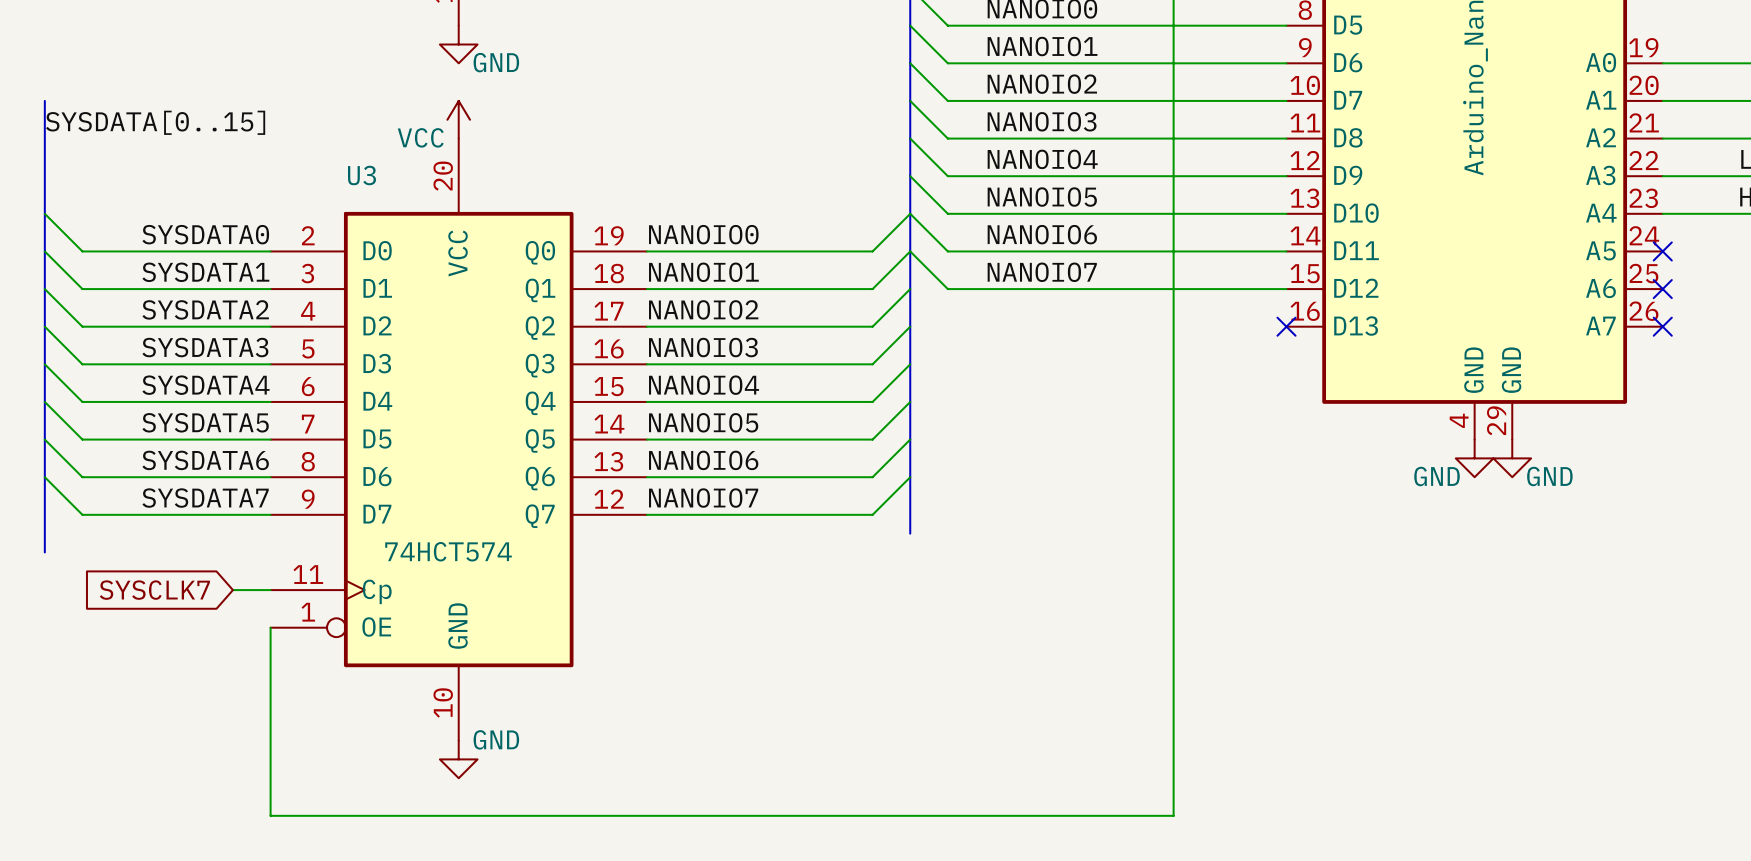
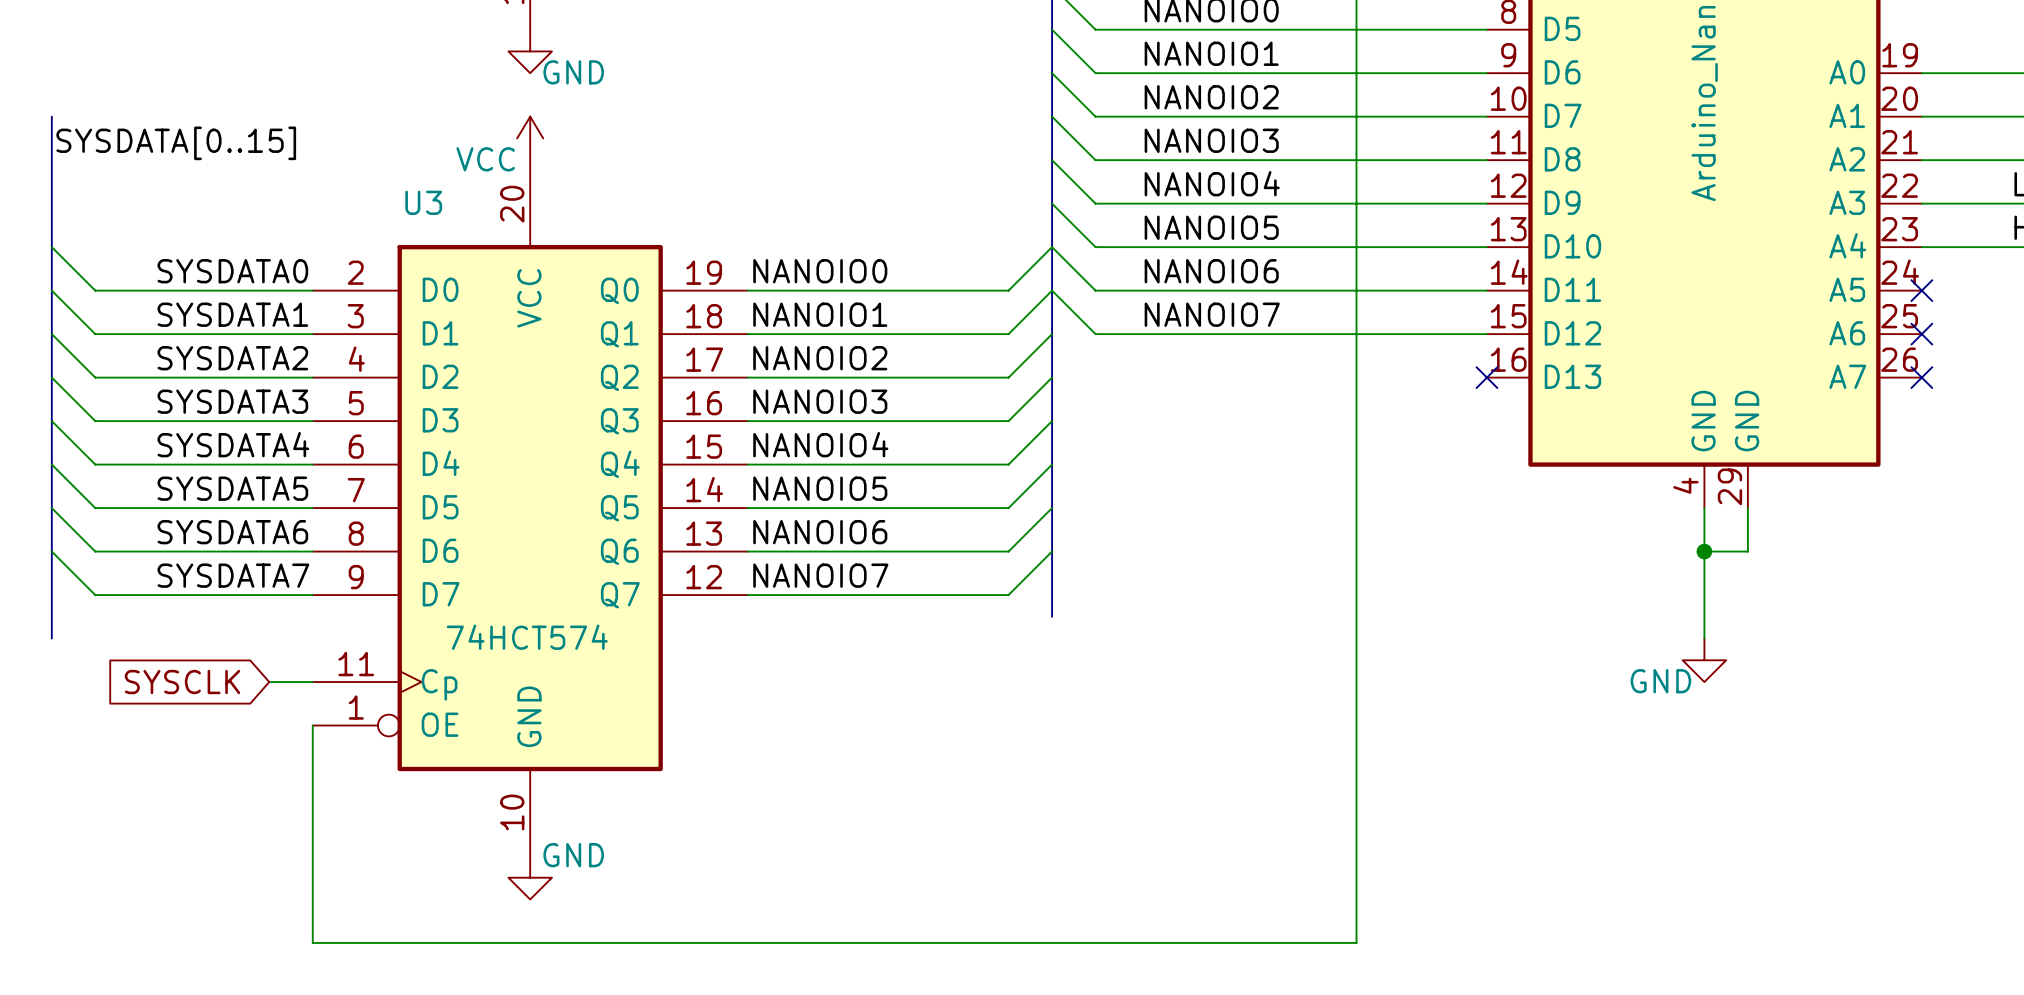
wire: none -> (1704, 508) (1704, 638)
wire: none -> (1747, 508) (1747, 551) (1704, 551)
power symbol: GND (1474, 458) -> none
power symbol: GND (1512, 458) -> none
junction: none -> (1704, 551)
power symbol: none -> GND (1704, 660)
global label: SYSCLK7 (154, 590) -> SYSCLK (182, 682)

